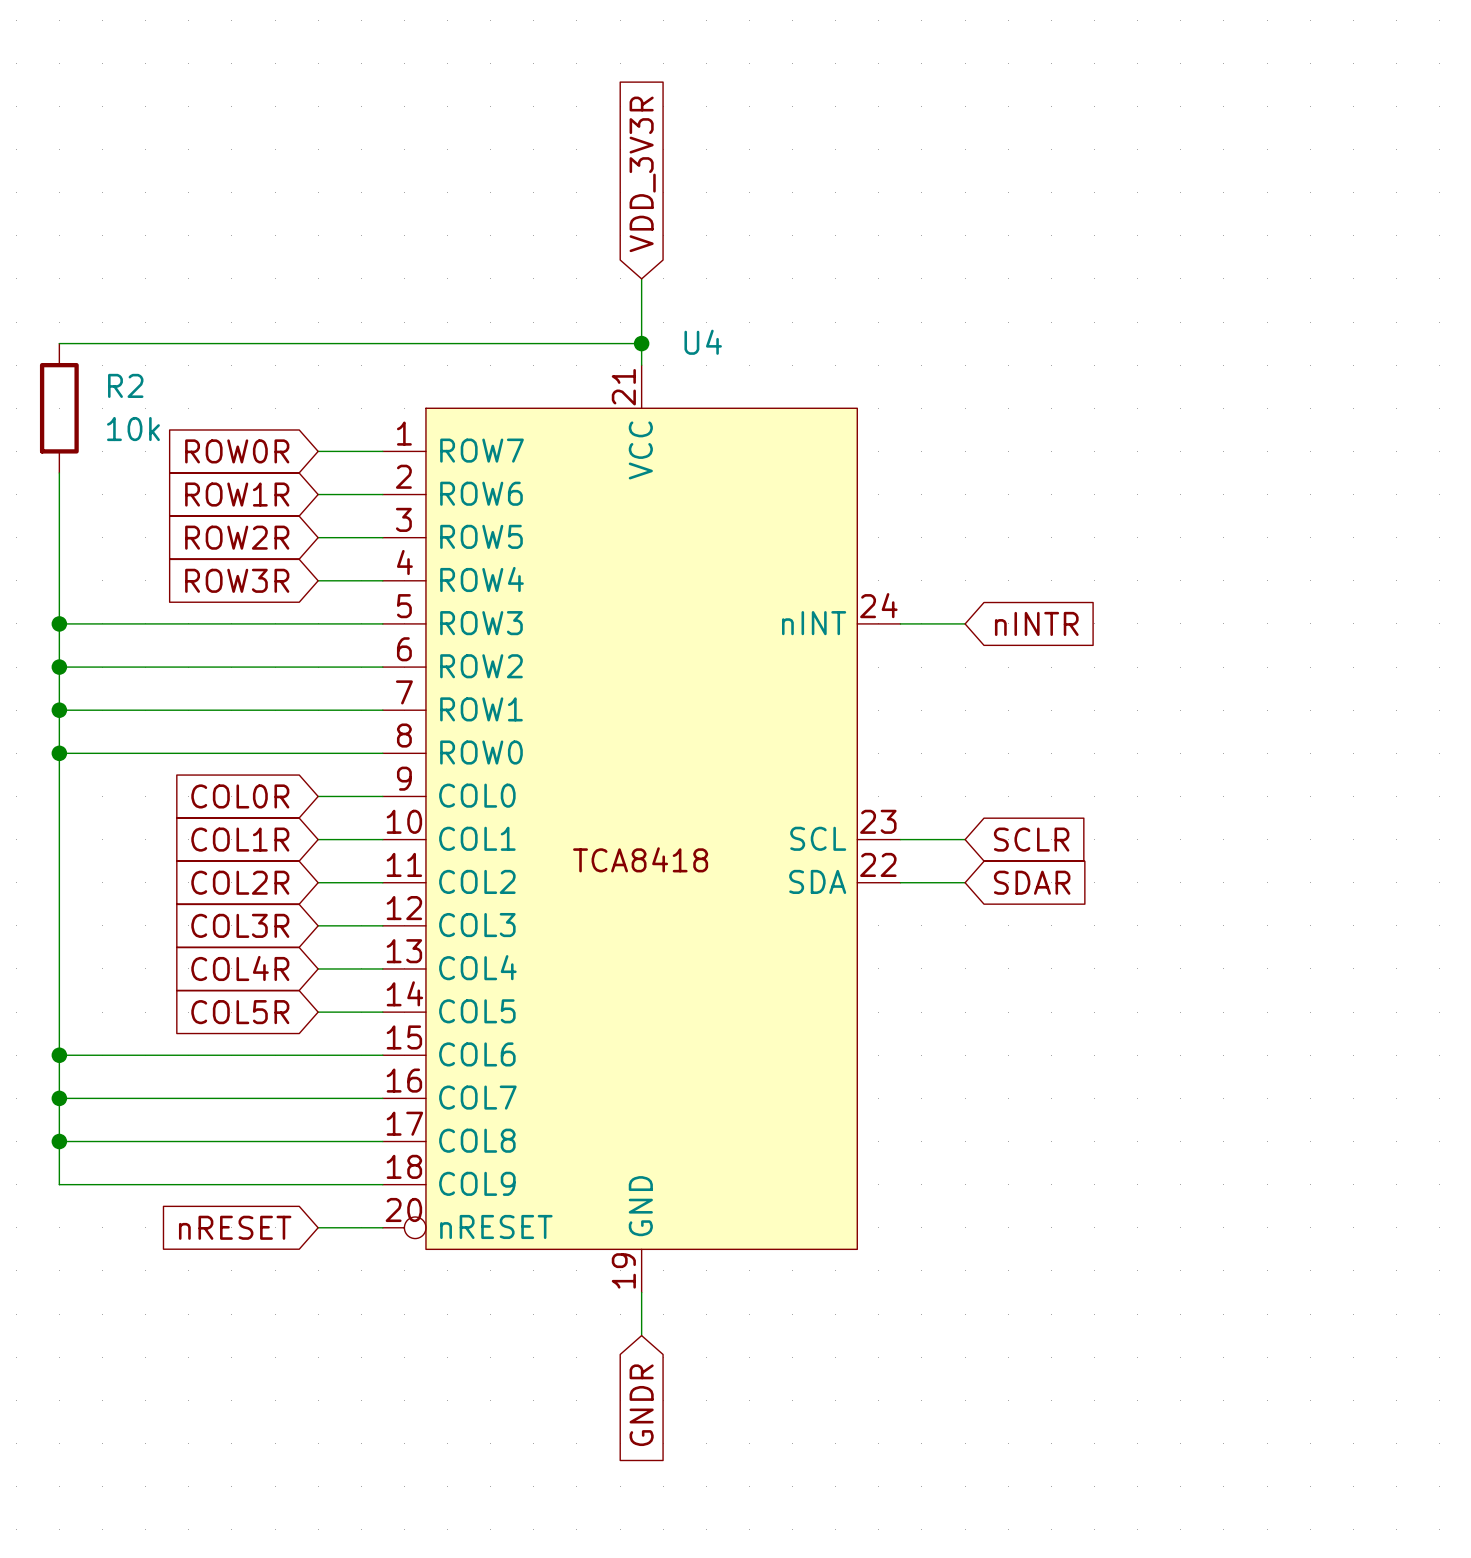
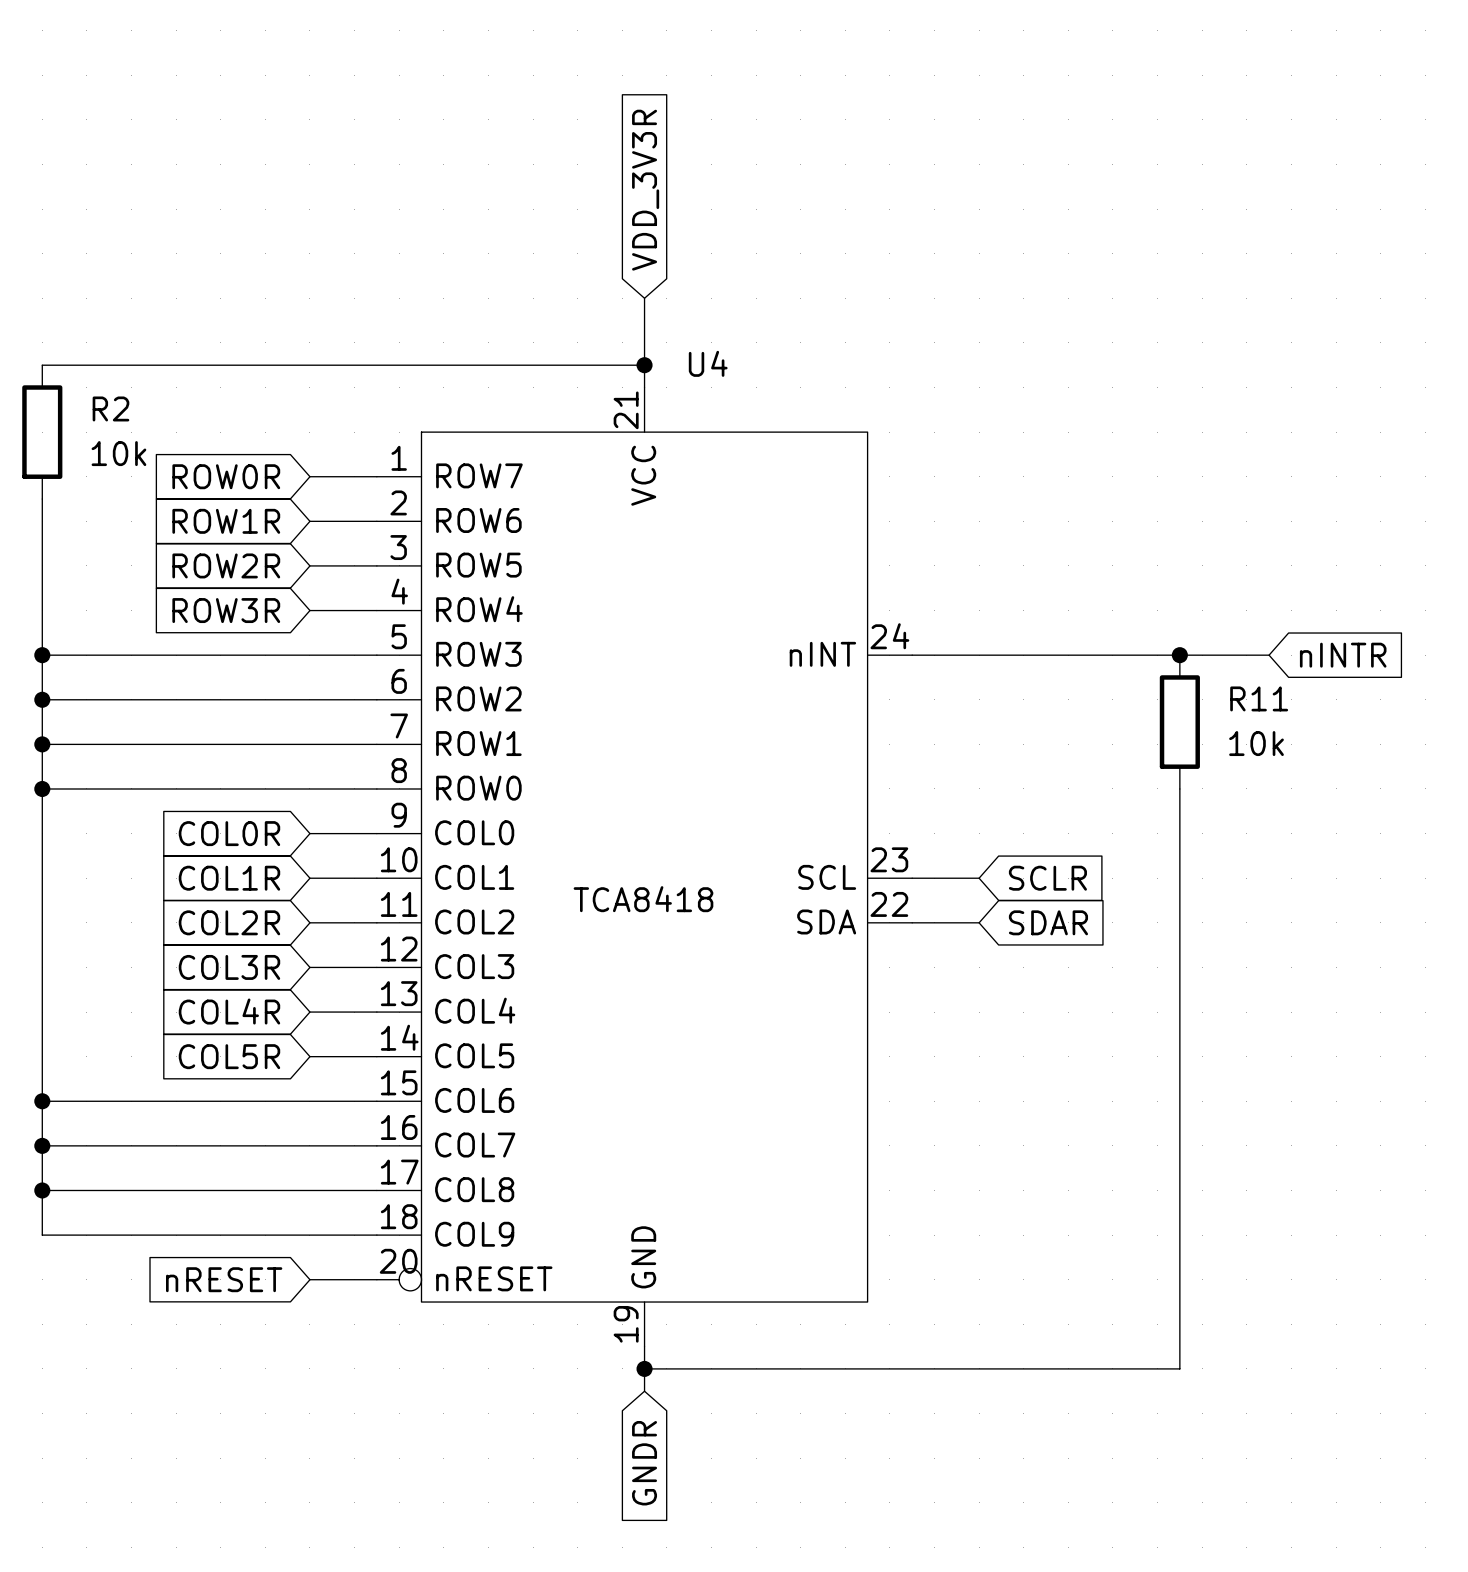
wire: none -> (979, 655) (1269, 655)
global label position: nINTR (1036, 623) -> nINTR (1343, 655)
junction: none -> (1179, 655)
R11: none -> 10k (1179, 722)
wire: none -> (1179, 788) (1179, 1368) (644, 1368)
junction: none -> (644, 1368)

